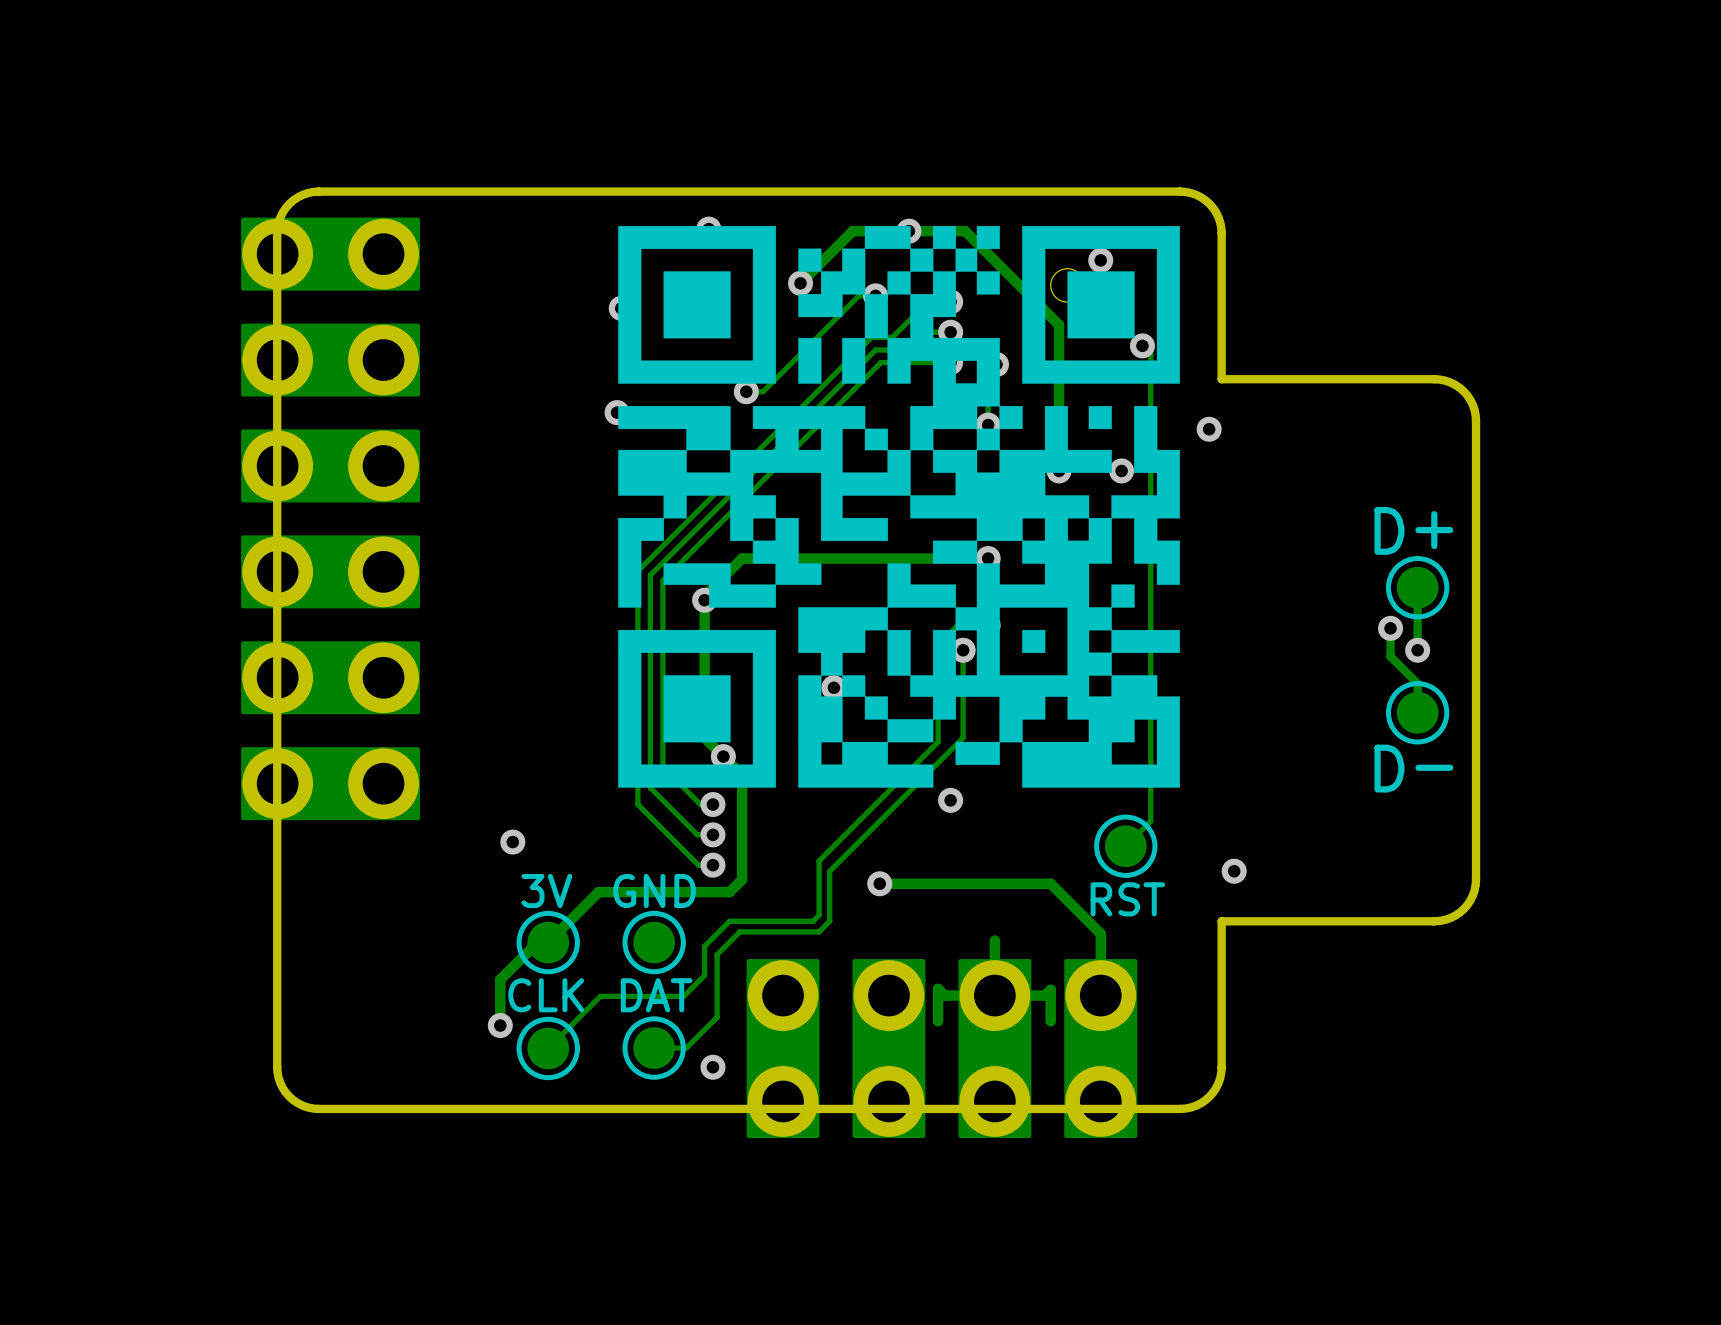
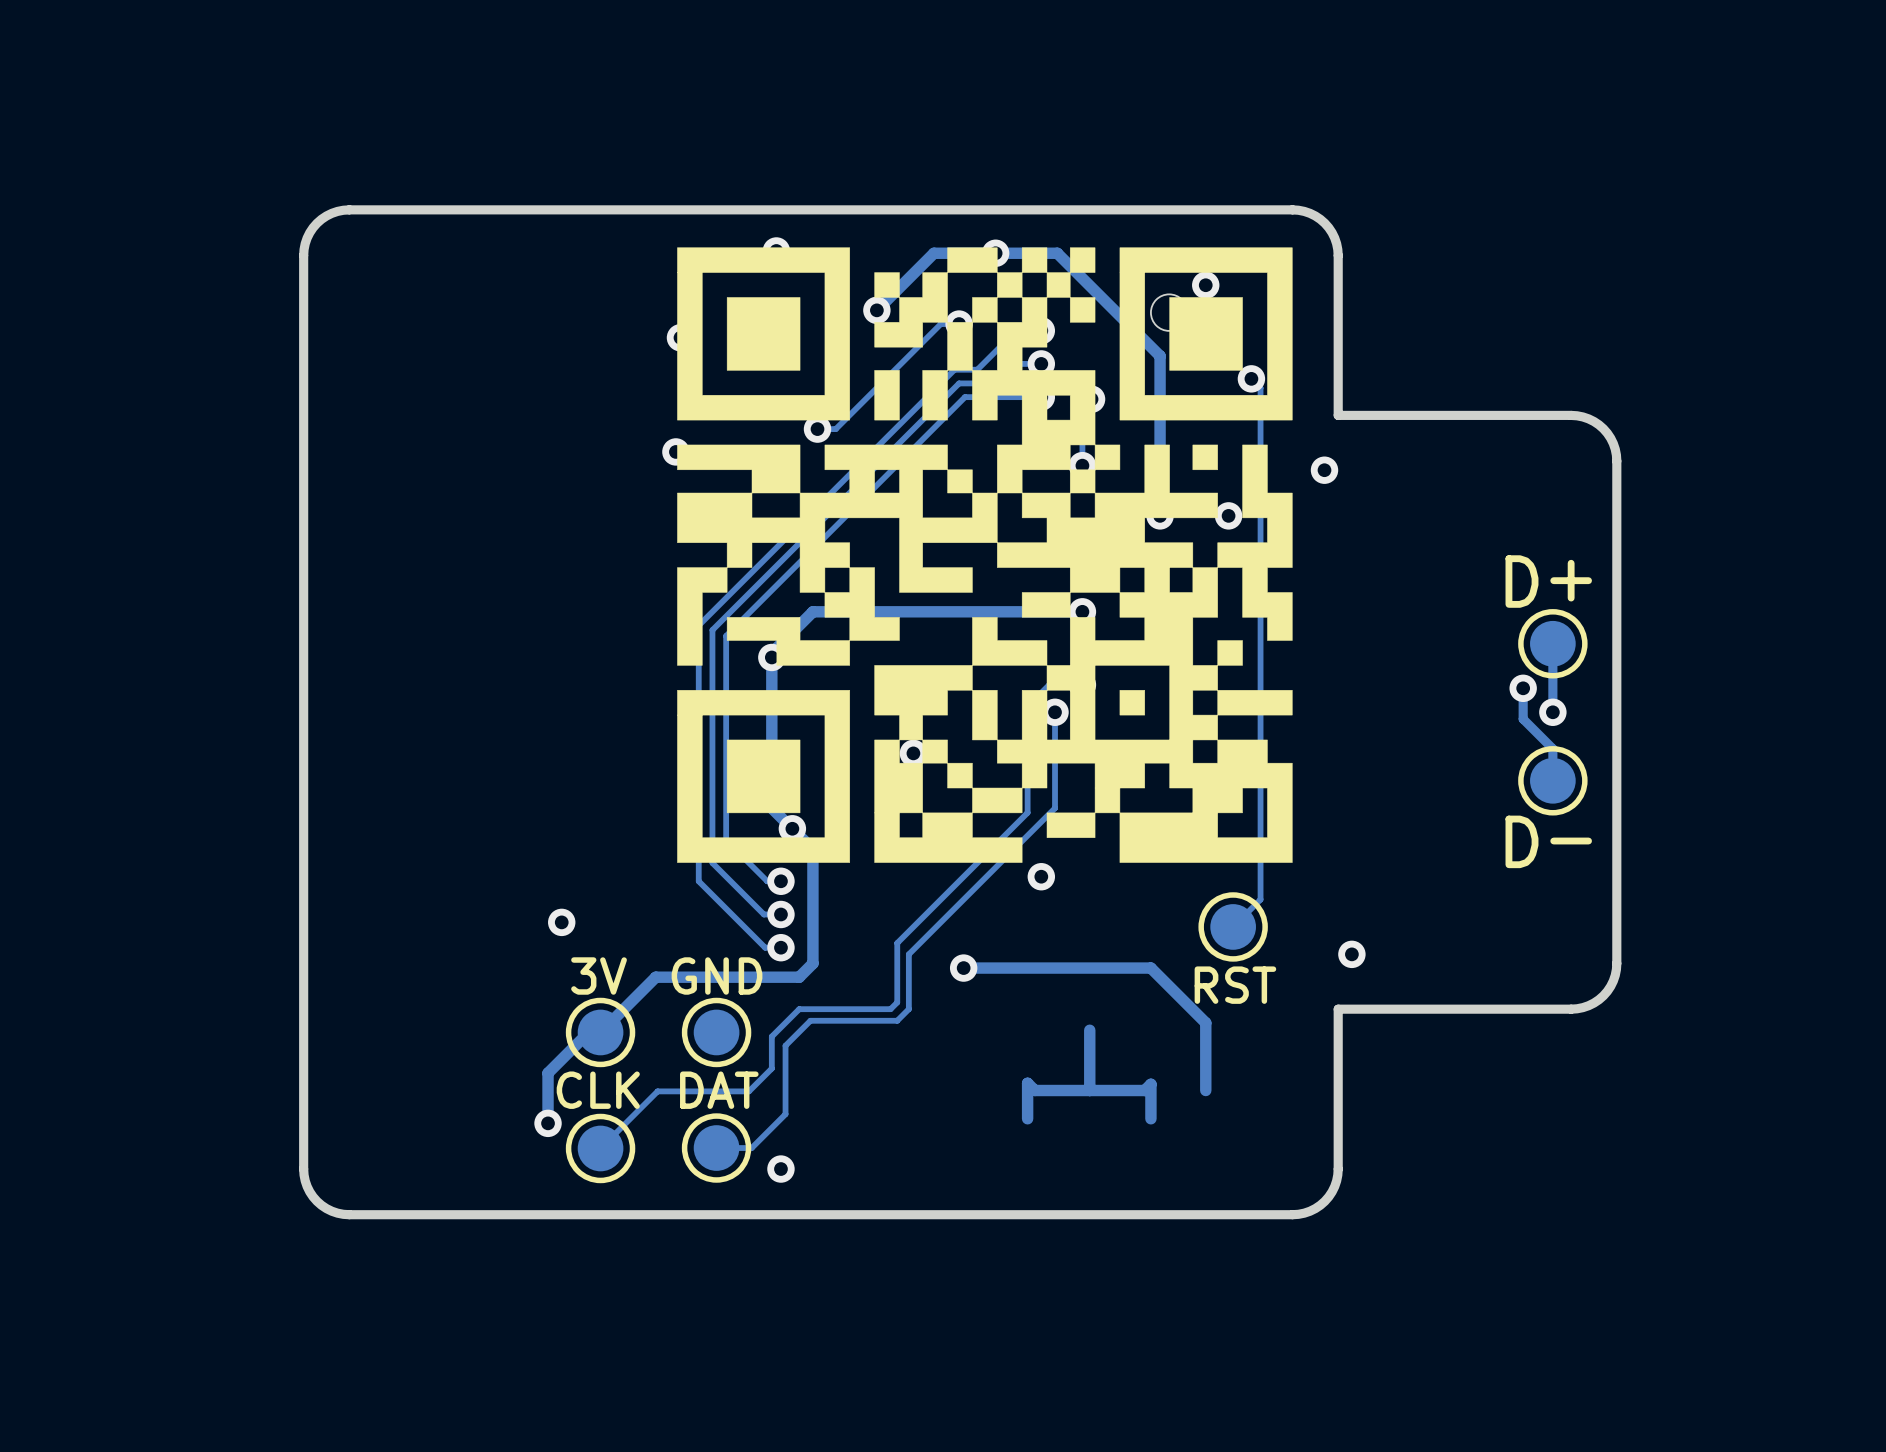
part: (330, 518) -> none
part: (941, 1048) -> none

